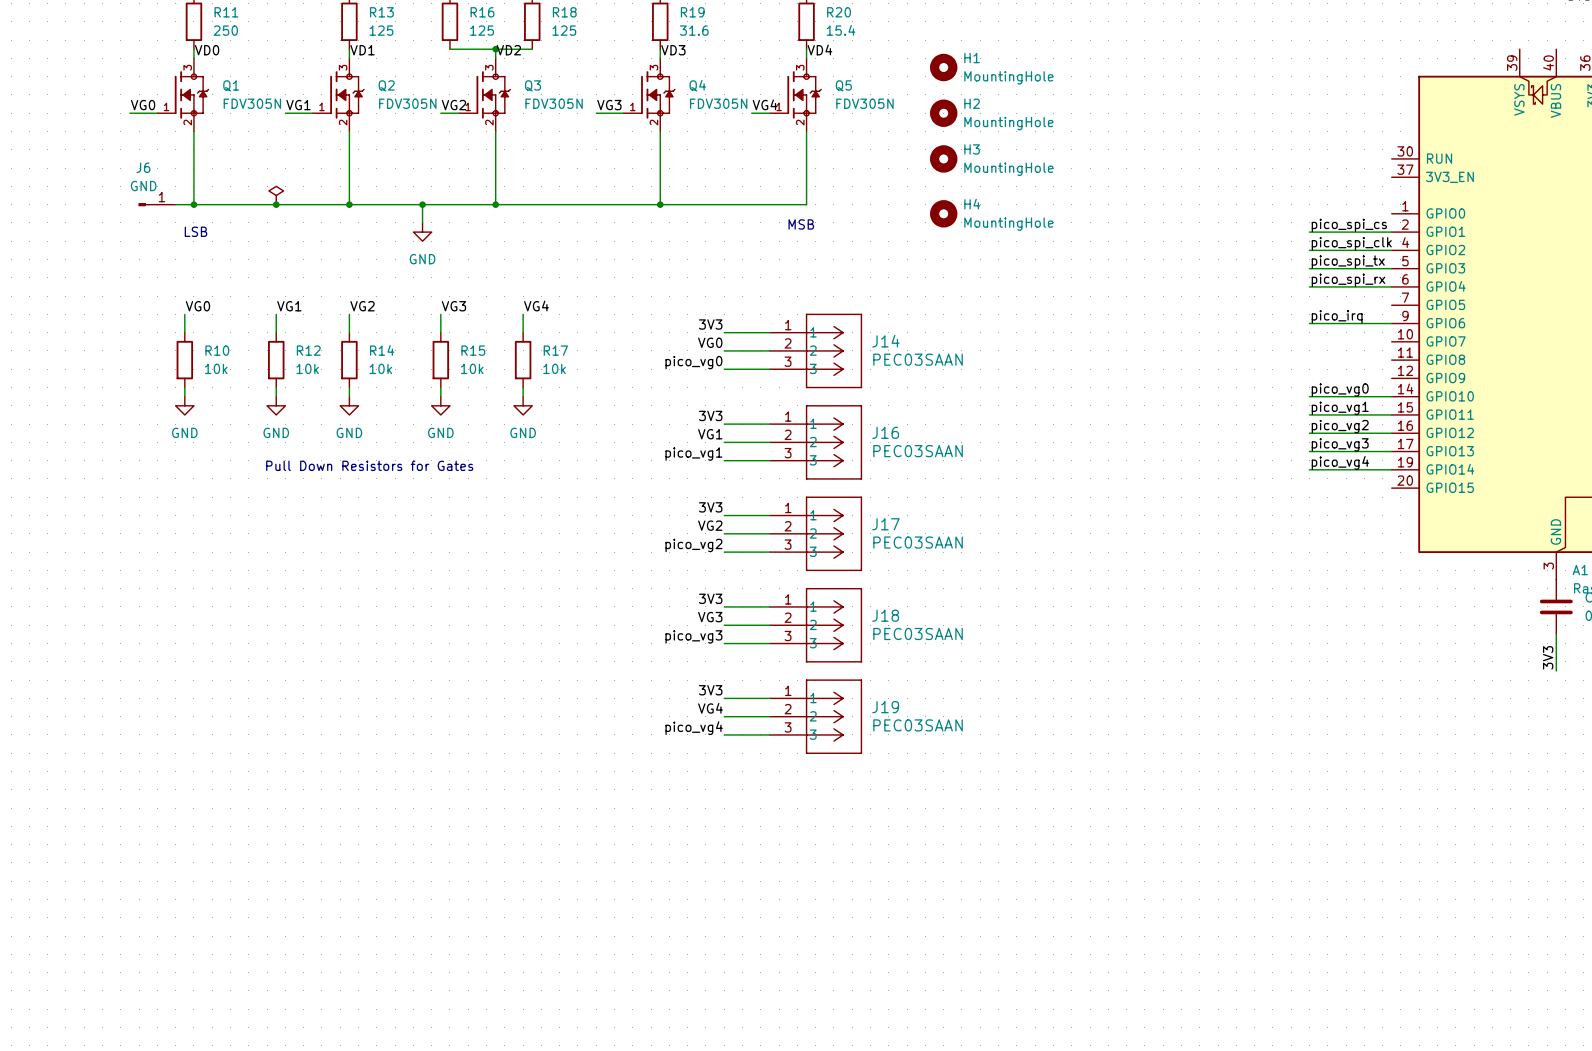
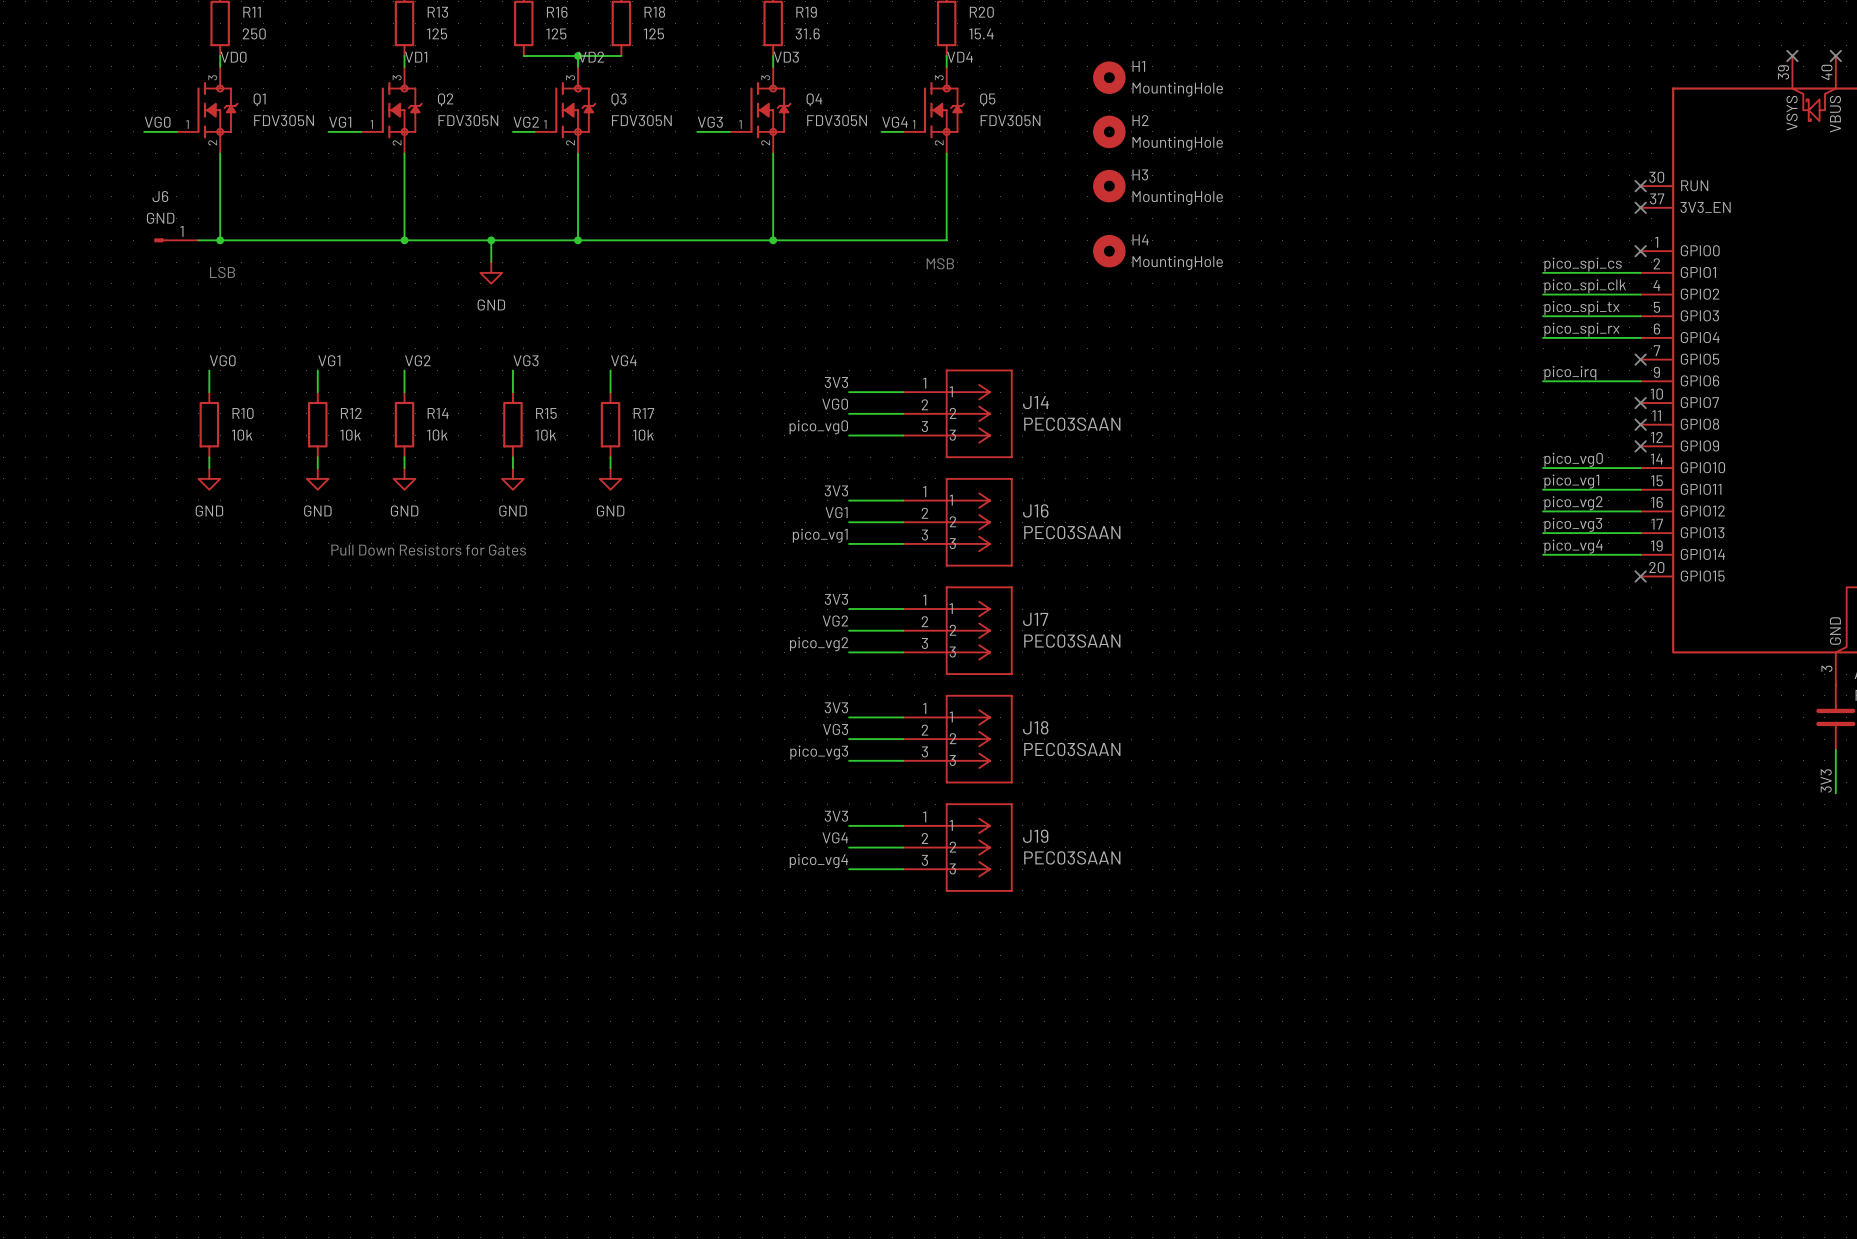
no-connect mark: none -> (1792, 56)
no-connect mark: none -> (1835, 56)
no-connect mark: none -> (1640, 186)
no-connect mark: none -> (1640, 207)
power symbol: (276, 195) -> none
junction: (276, 204) -> none
no-connect mark: none -> (1640, 251)
no-connect mark: none -> (1640, 359)
no-connect mark: none -> (1640, 402)
no-connect mark: none -> (1640, 424)
no-connect mark: none -> (1640, 446)
no-connect mark: none -> (1640, 576)

